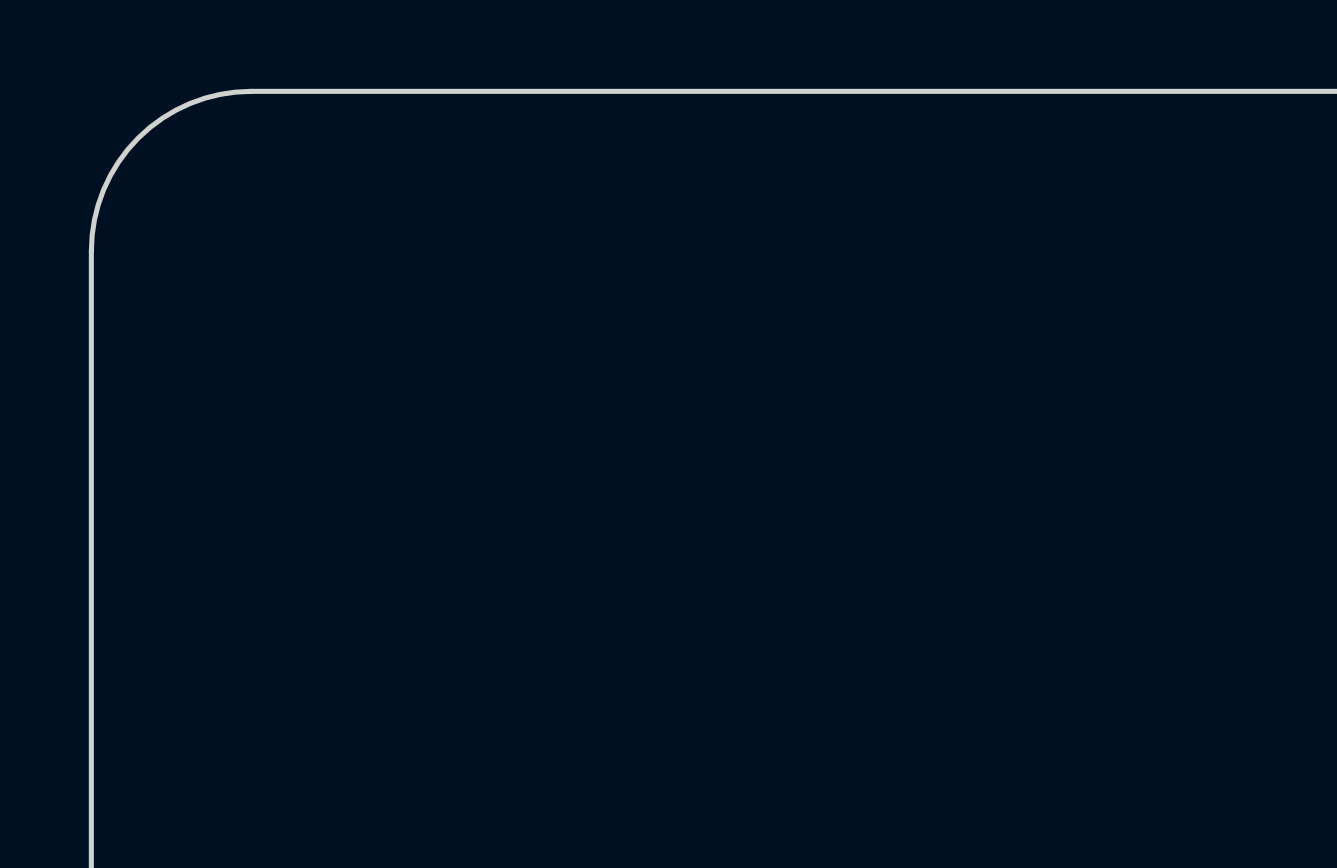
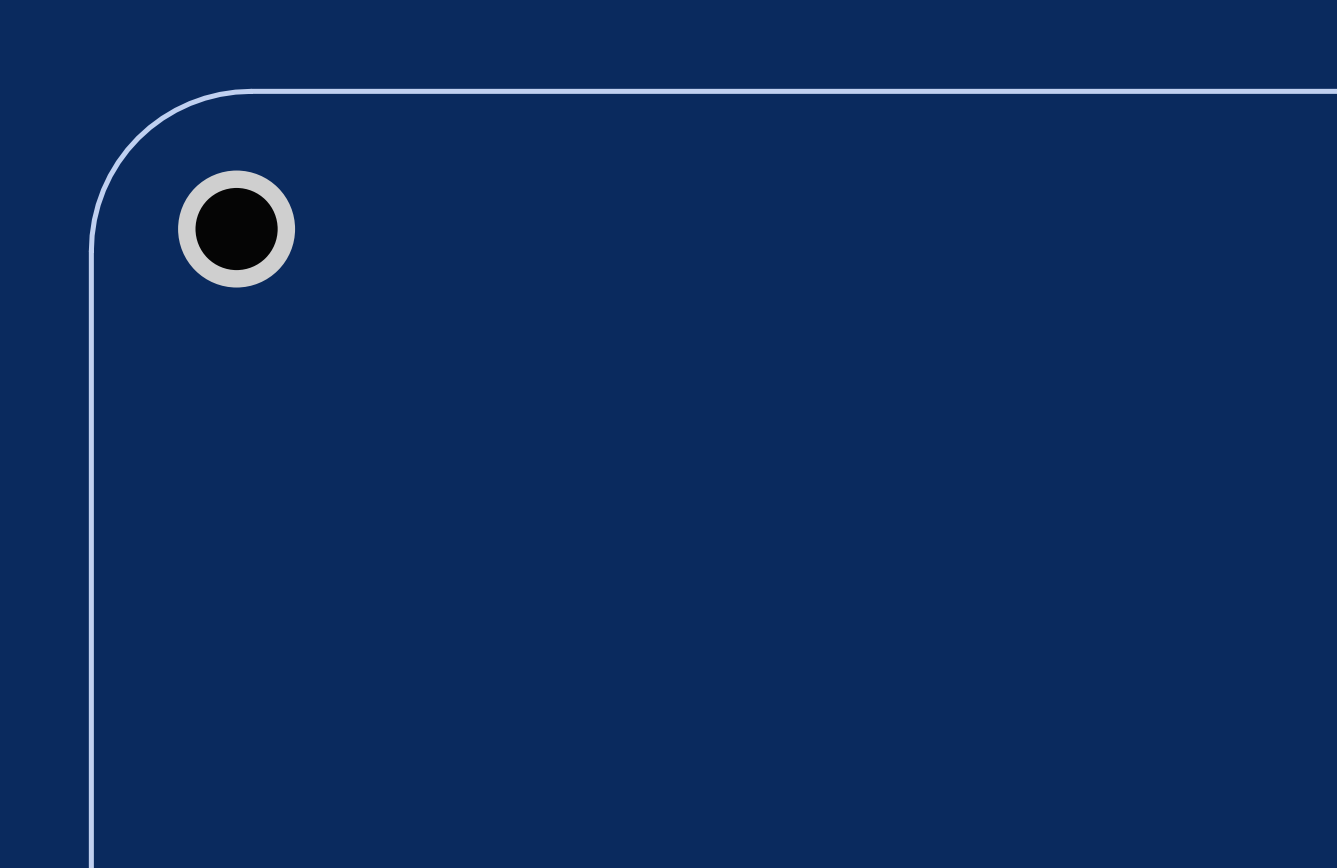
part: none -> (236, 229)

